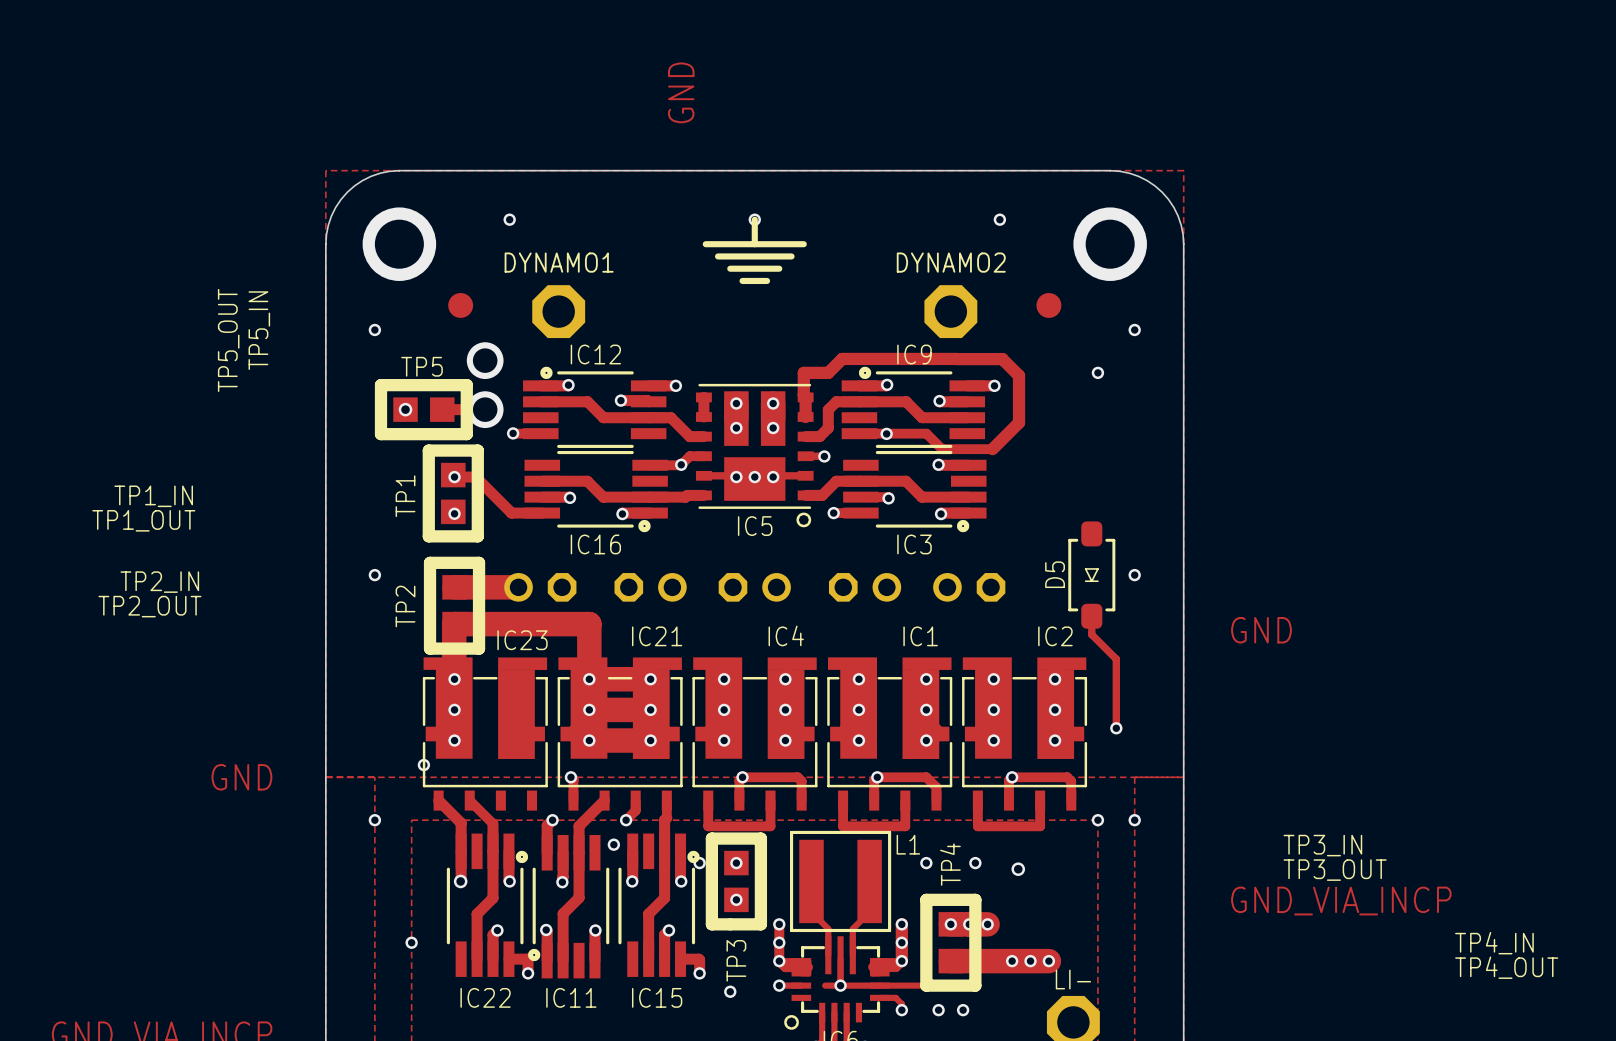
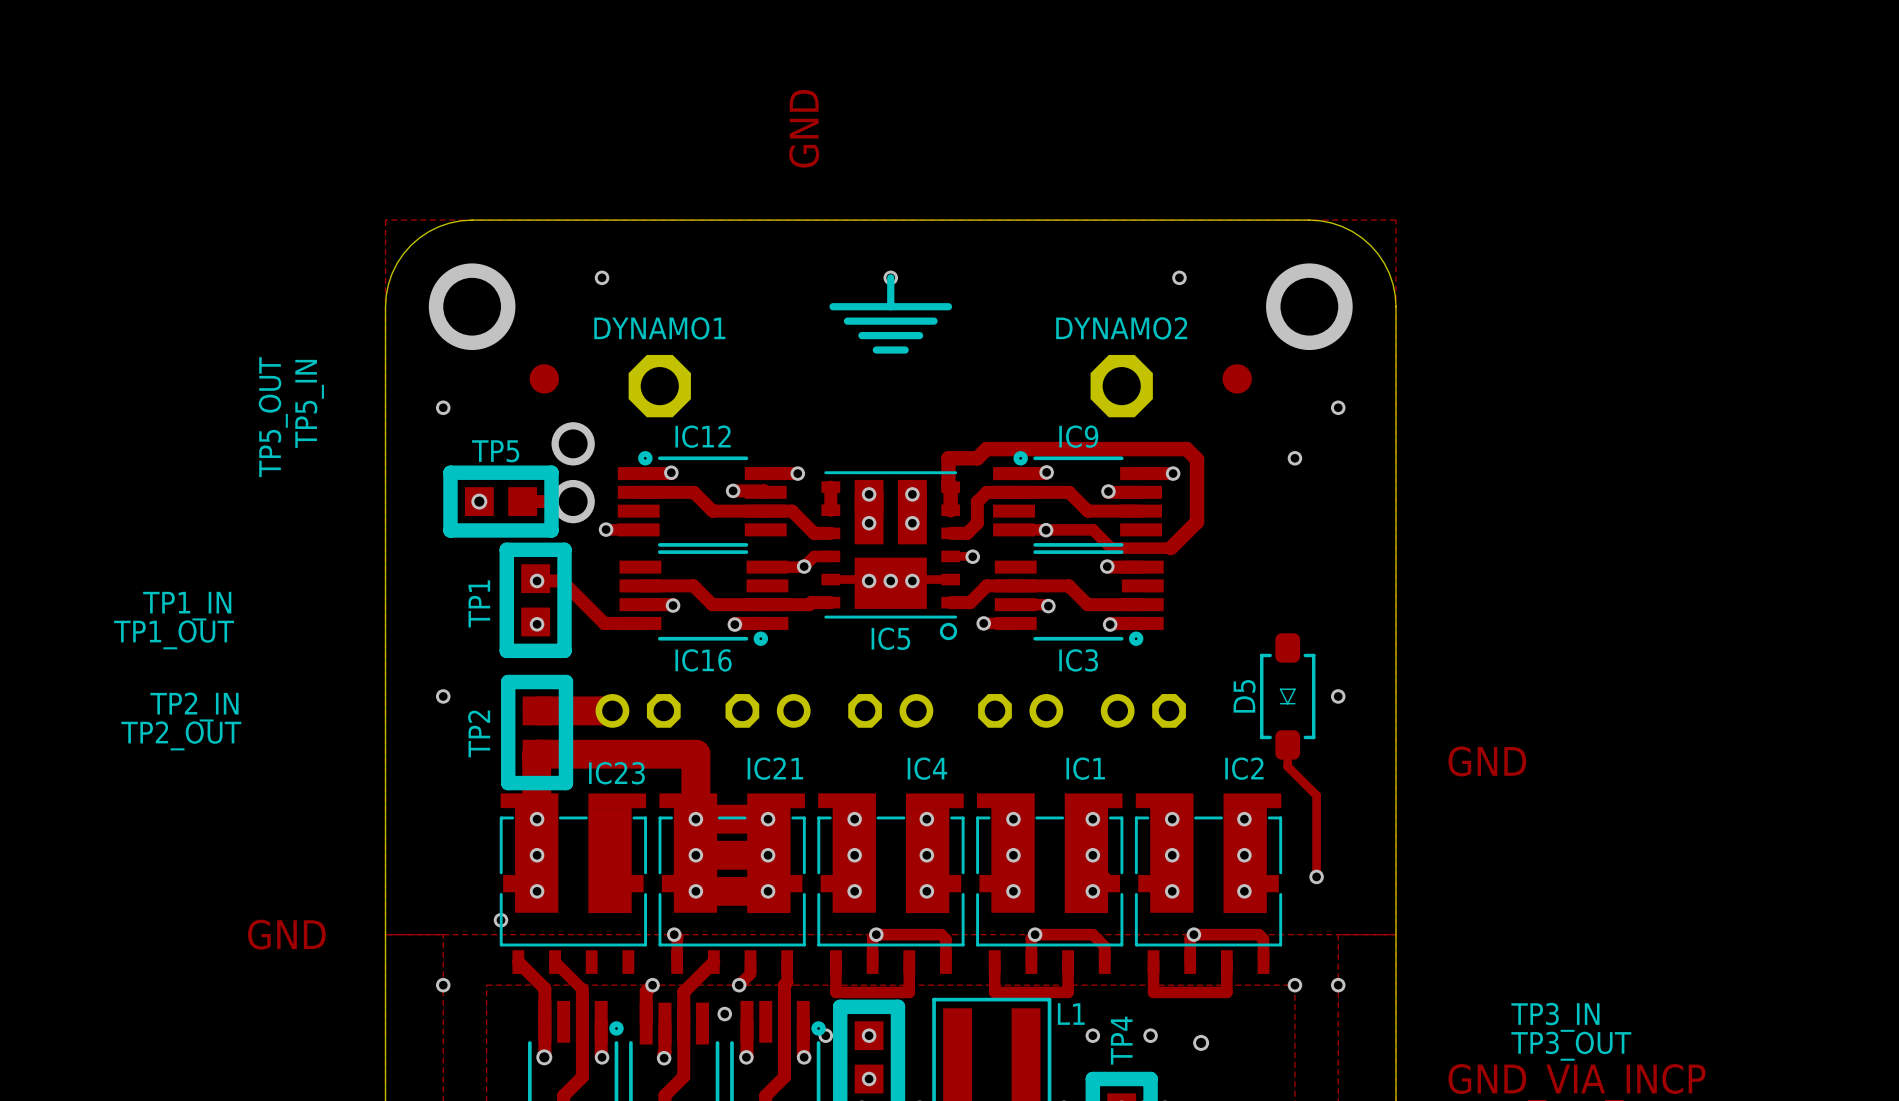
track: (956, 358) (842, 358) (836, 365) -> (1197, 521) (1197, 459) (1186, 449) (986, 449)
track: (957, 359) (1002, 359) (1019, 375) (1019, 422) (1014, 426) -> none

